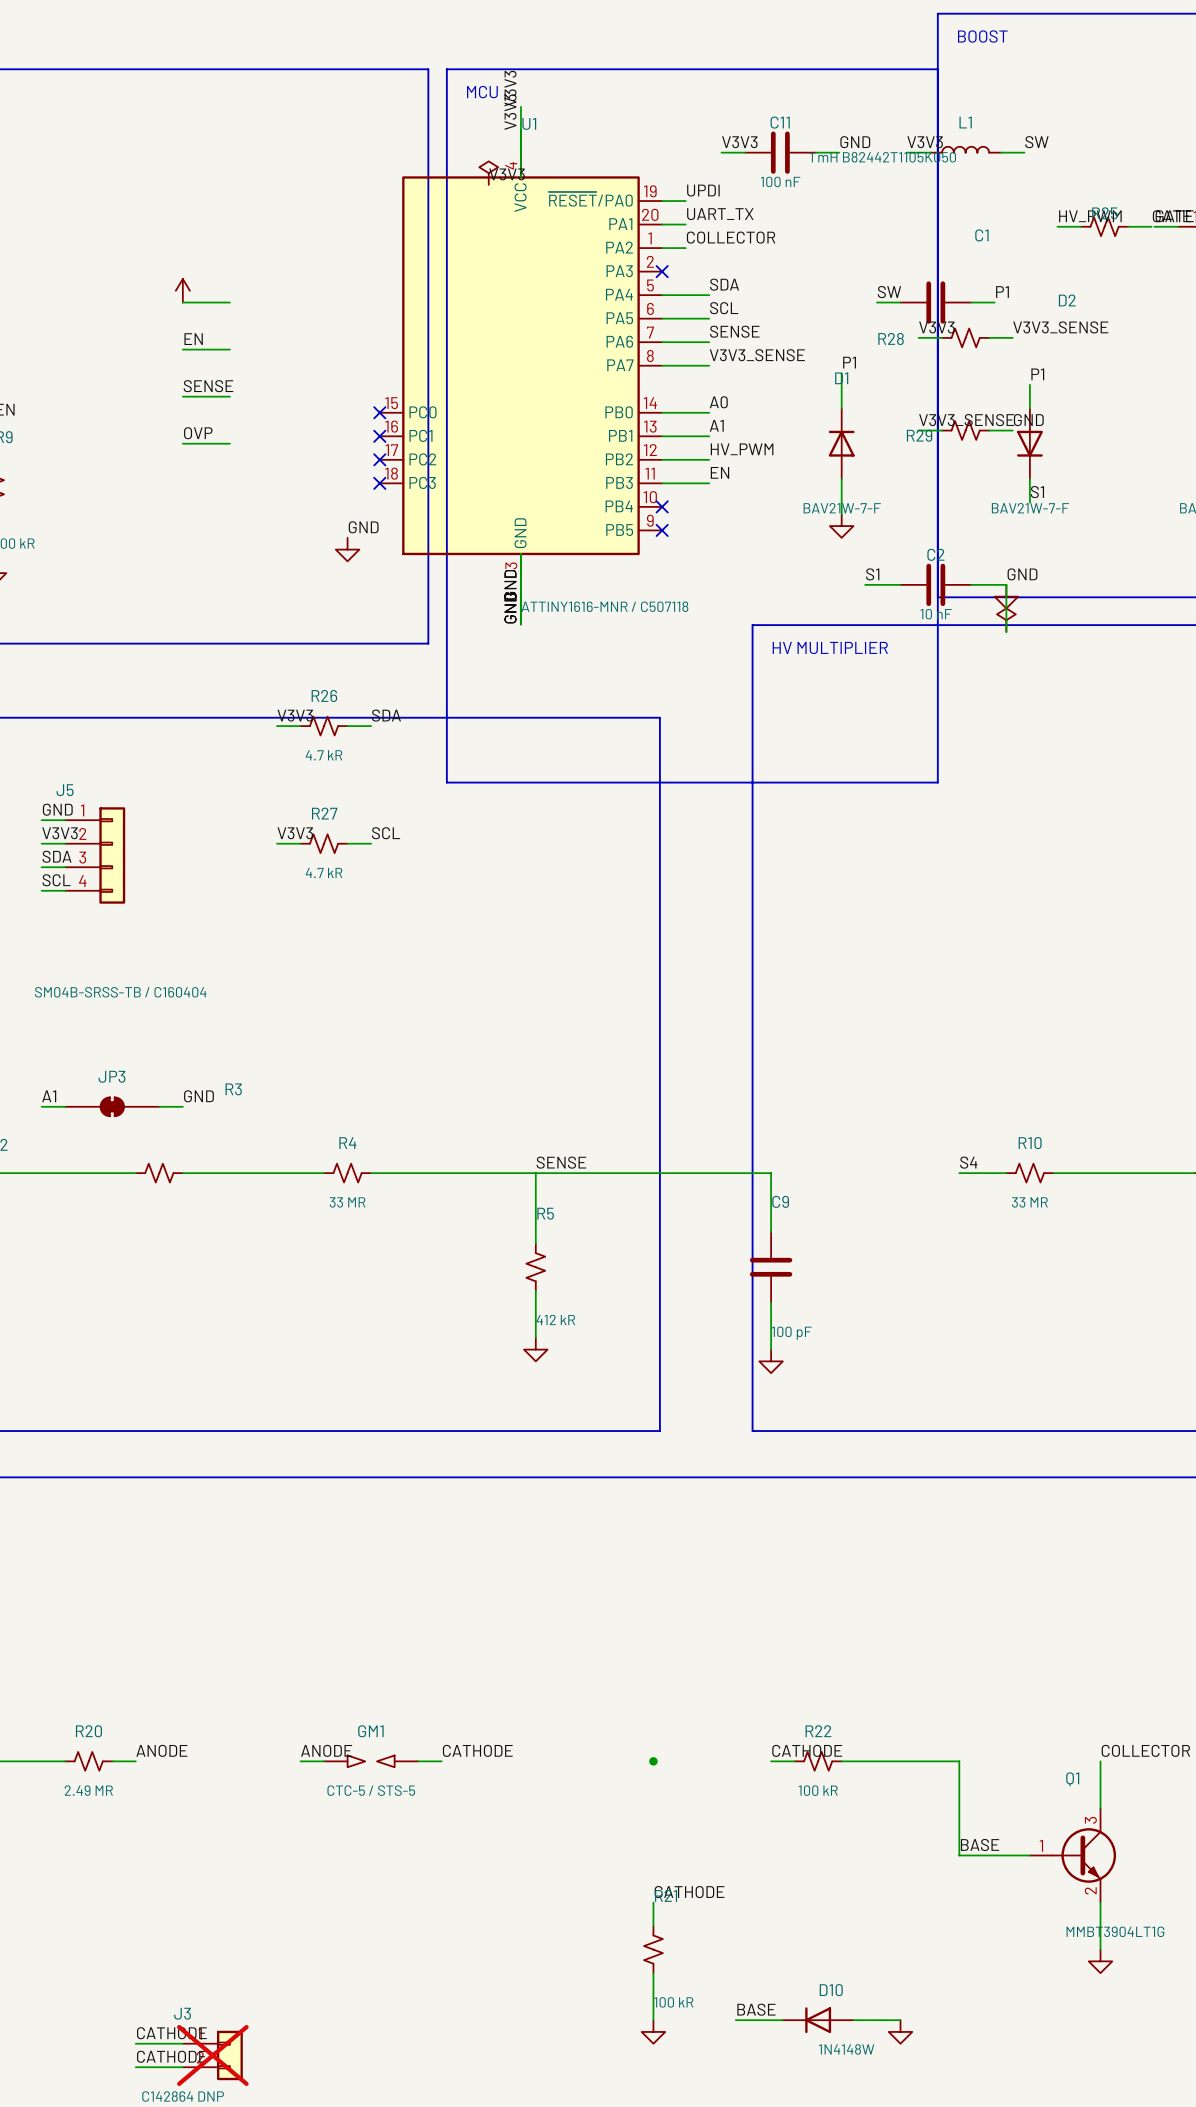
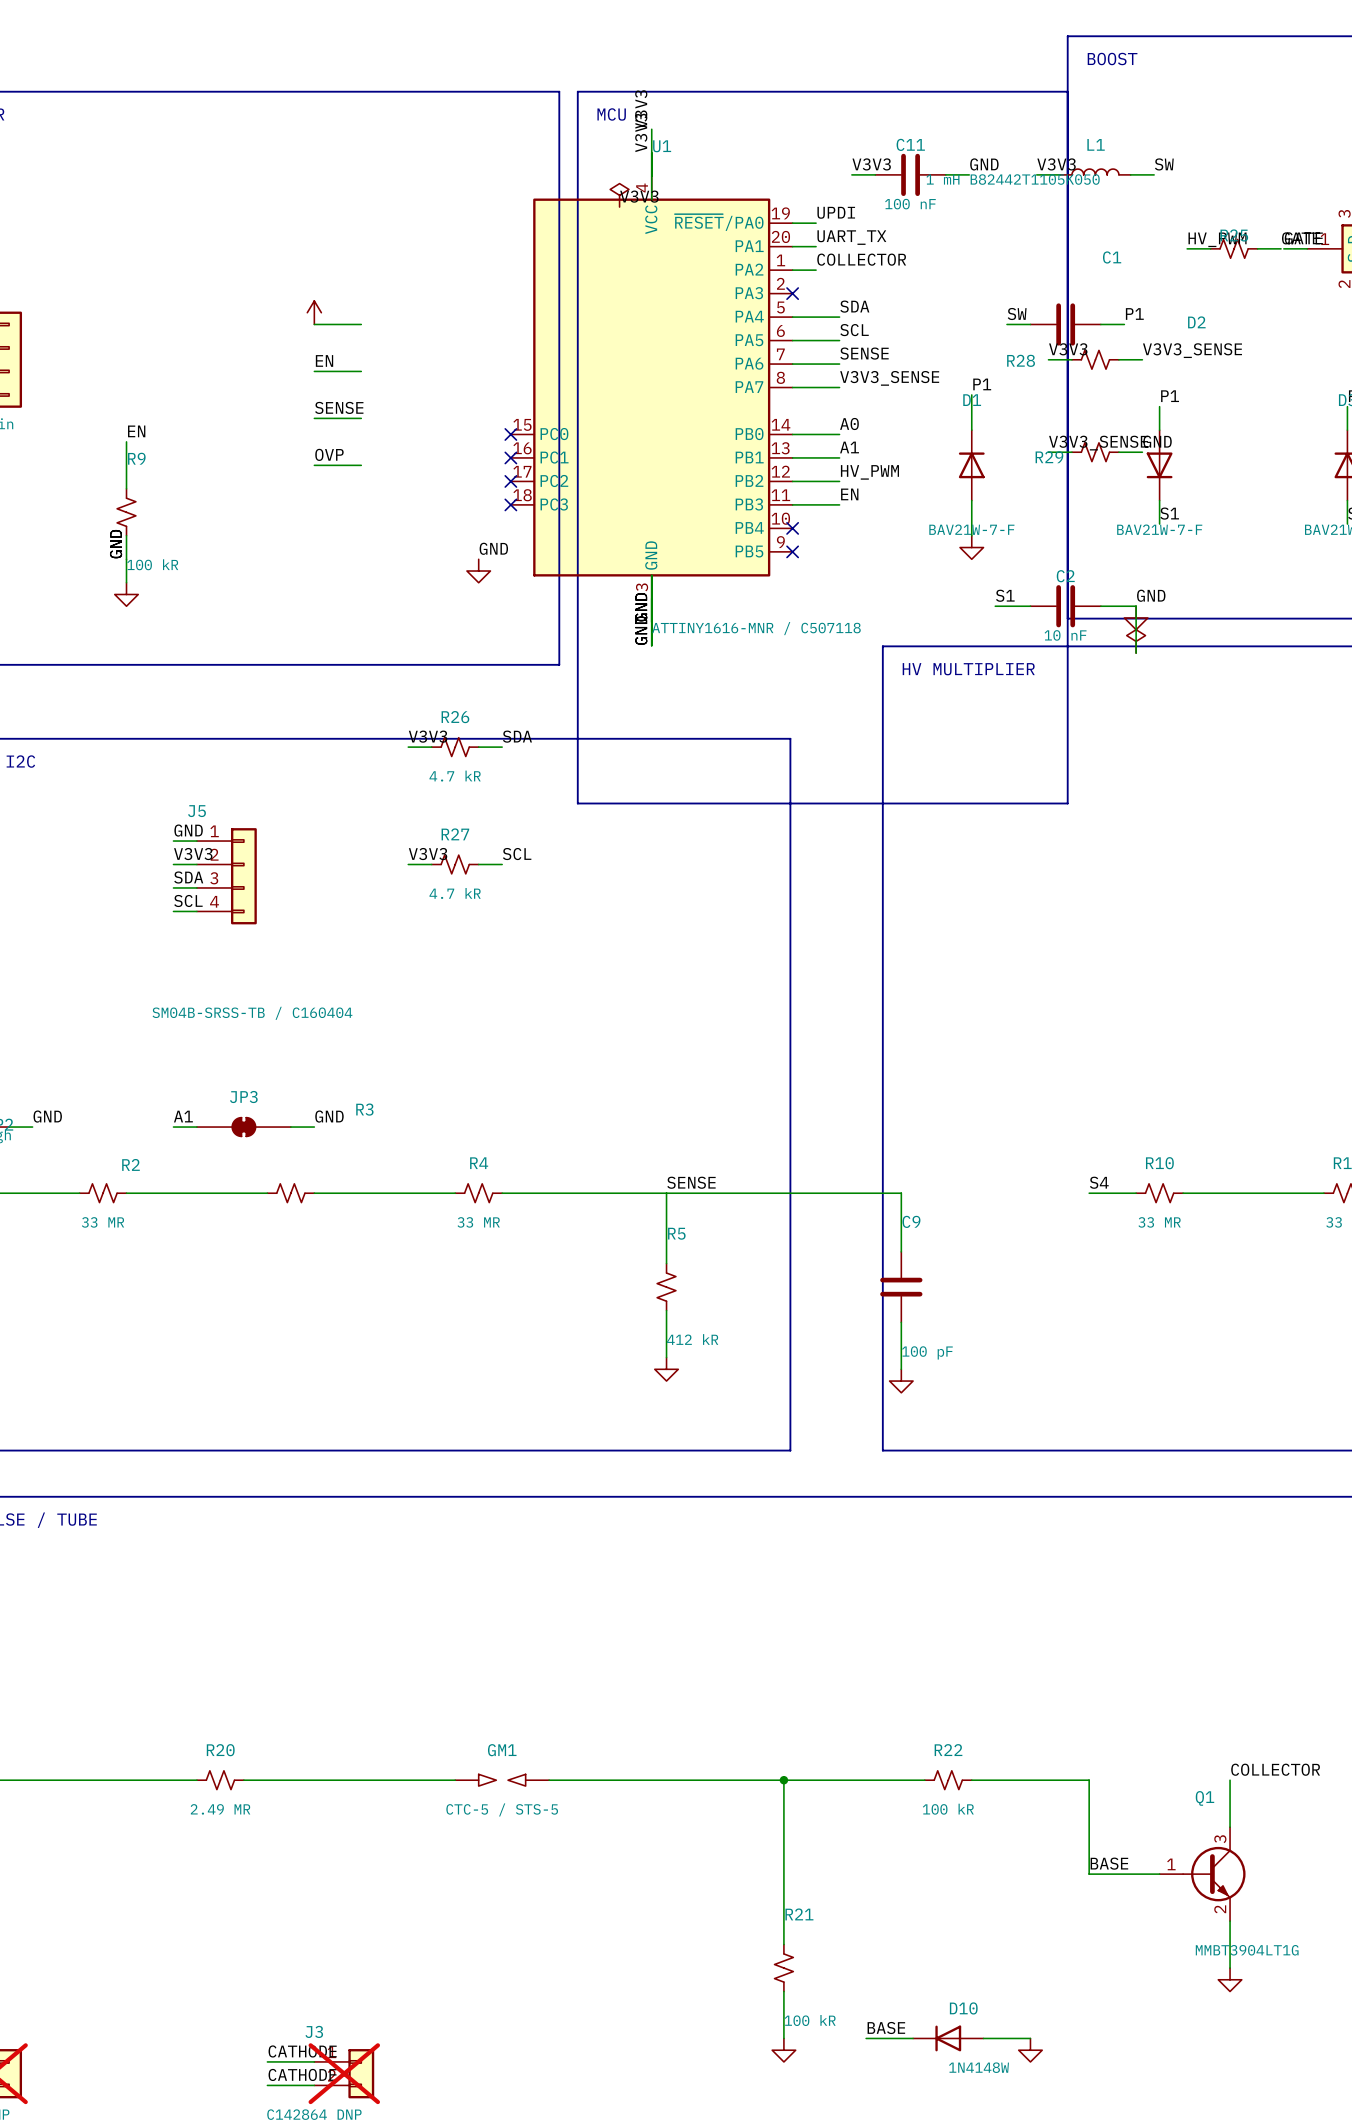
label: ANODE (161, 1750) -> none
label: ANODE (326, 1750) -> none
label: CATHODE (477, 1750) -> none
label: CATHODE (807, 1750) -> none
wire: none -> (267, 1780) (431, 1780)
wire: none -> (572, 1780) (901, 1780)
wire: none -> (783, 1780) (783, 1921)
label: CATHODE (689, 1892) -> none

